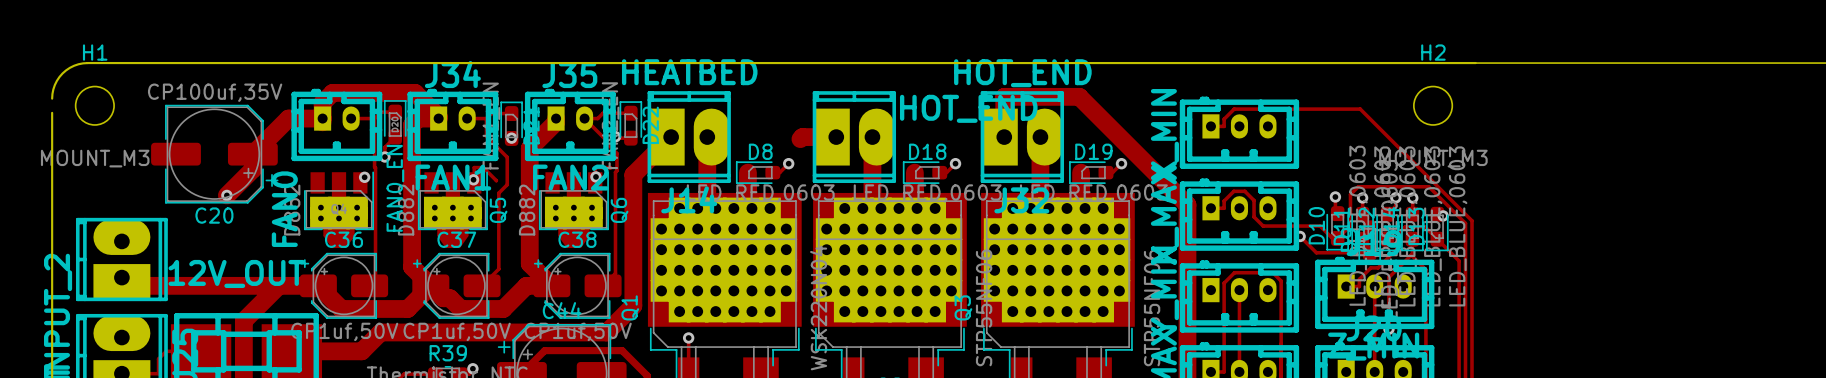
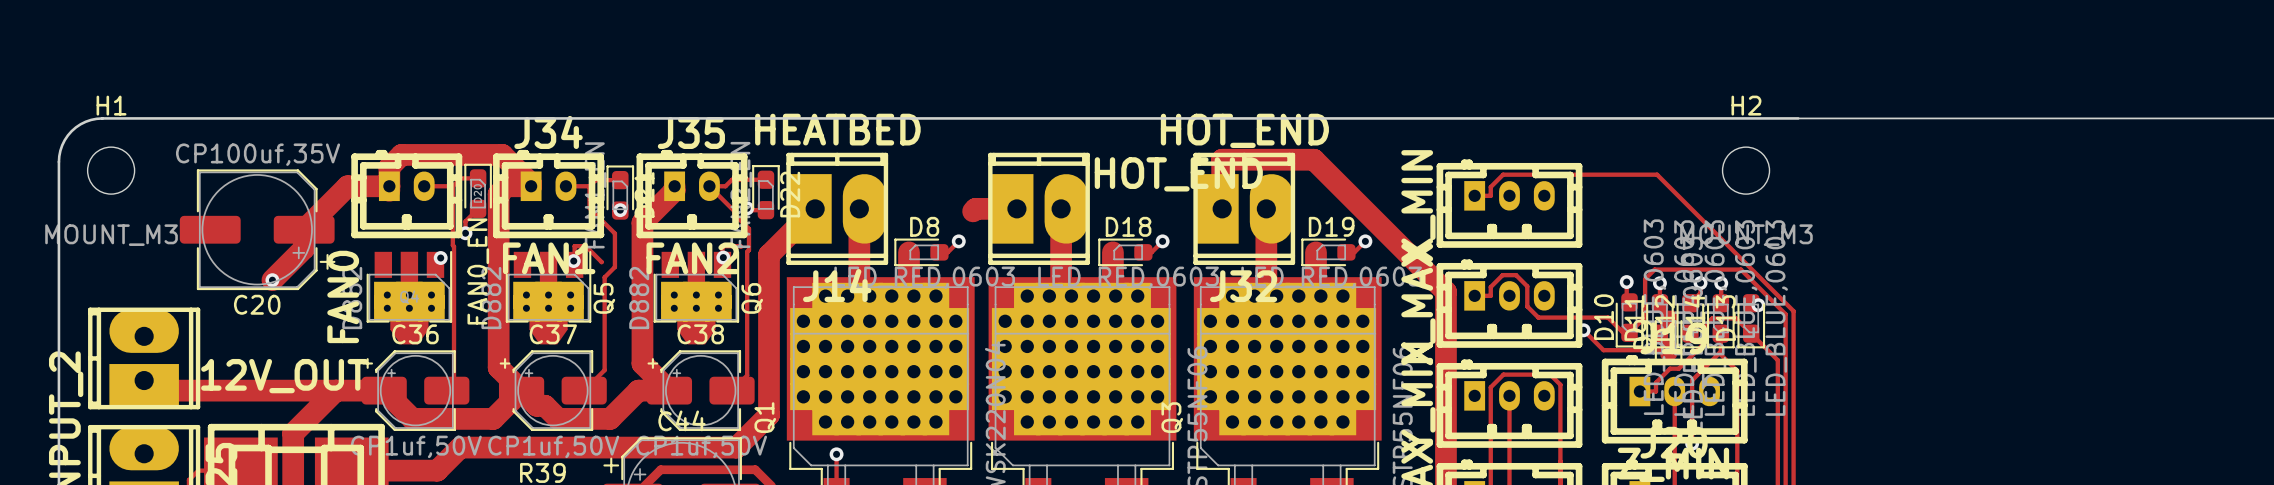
board edge: none -> (58, 161) (58, 179)

